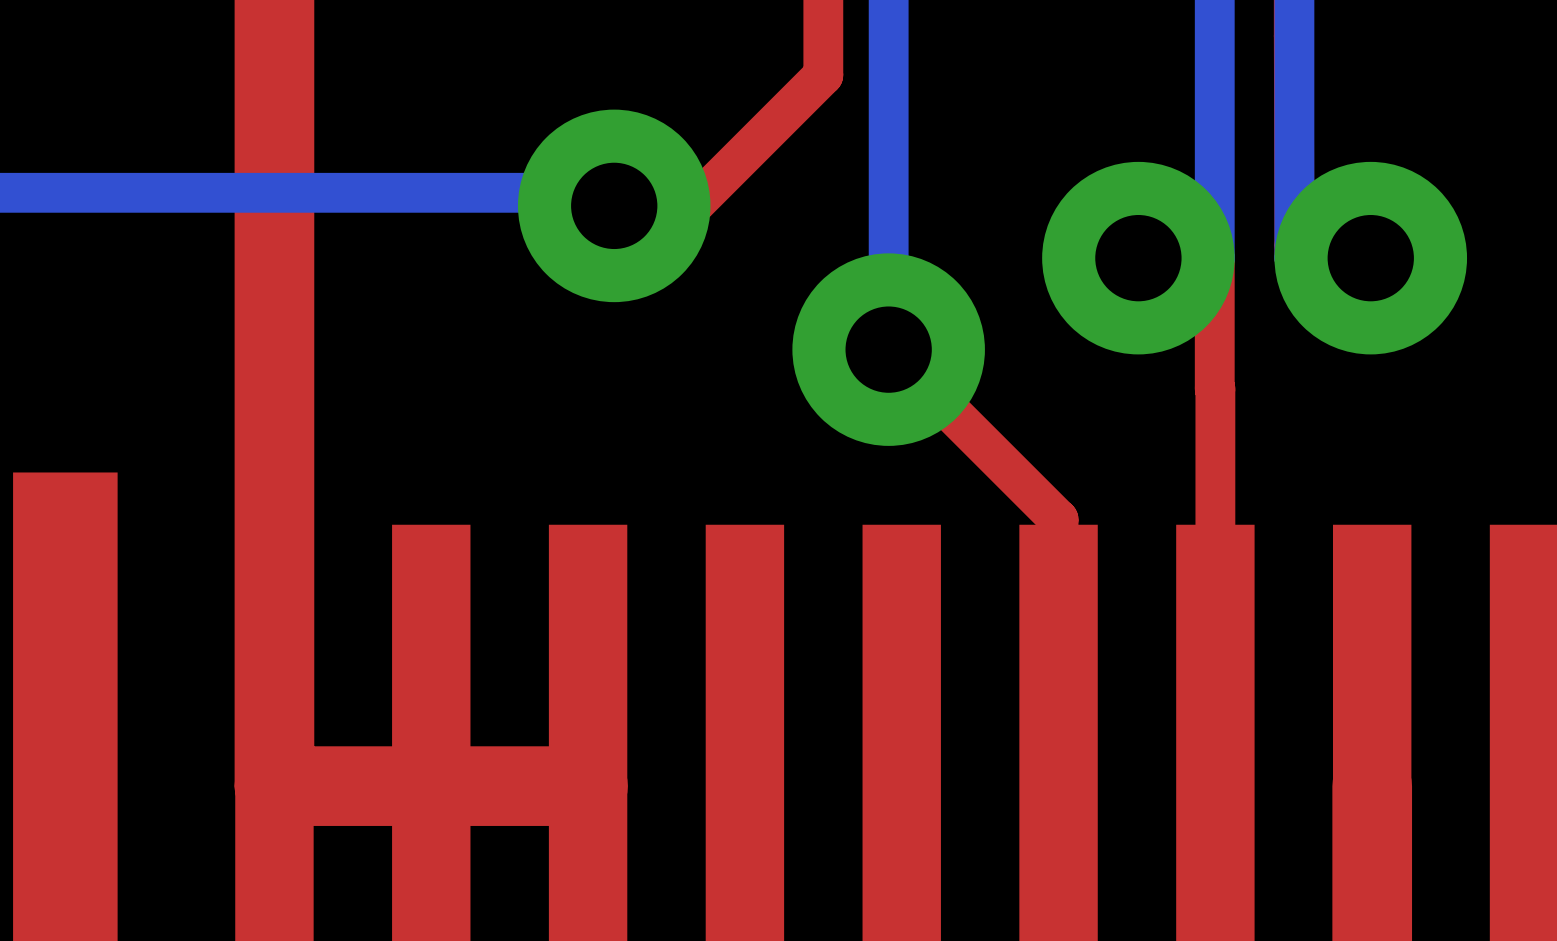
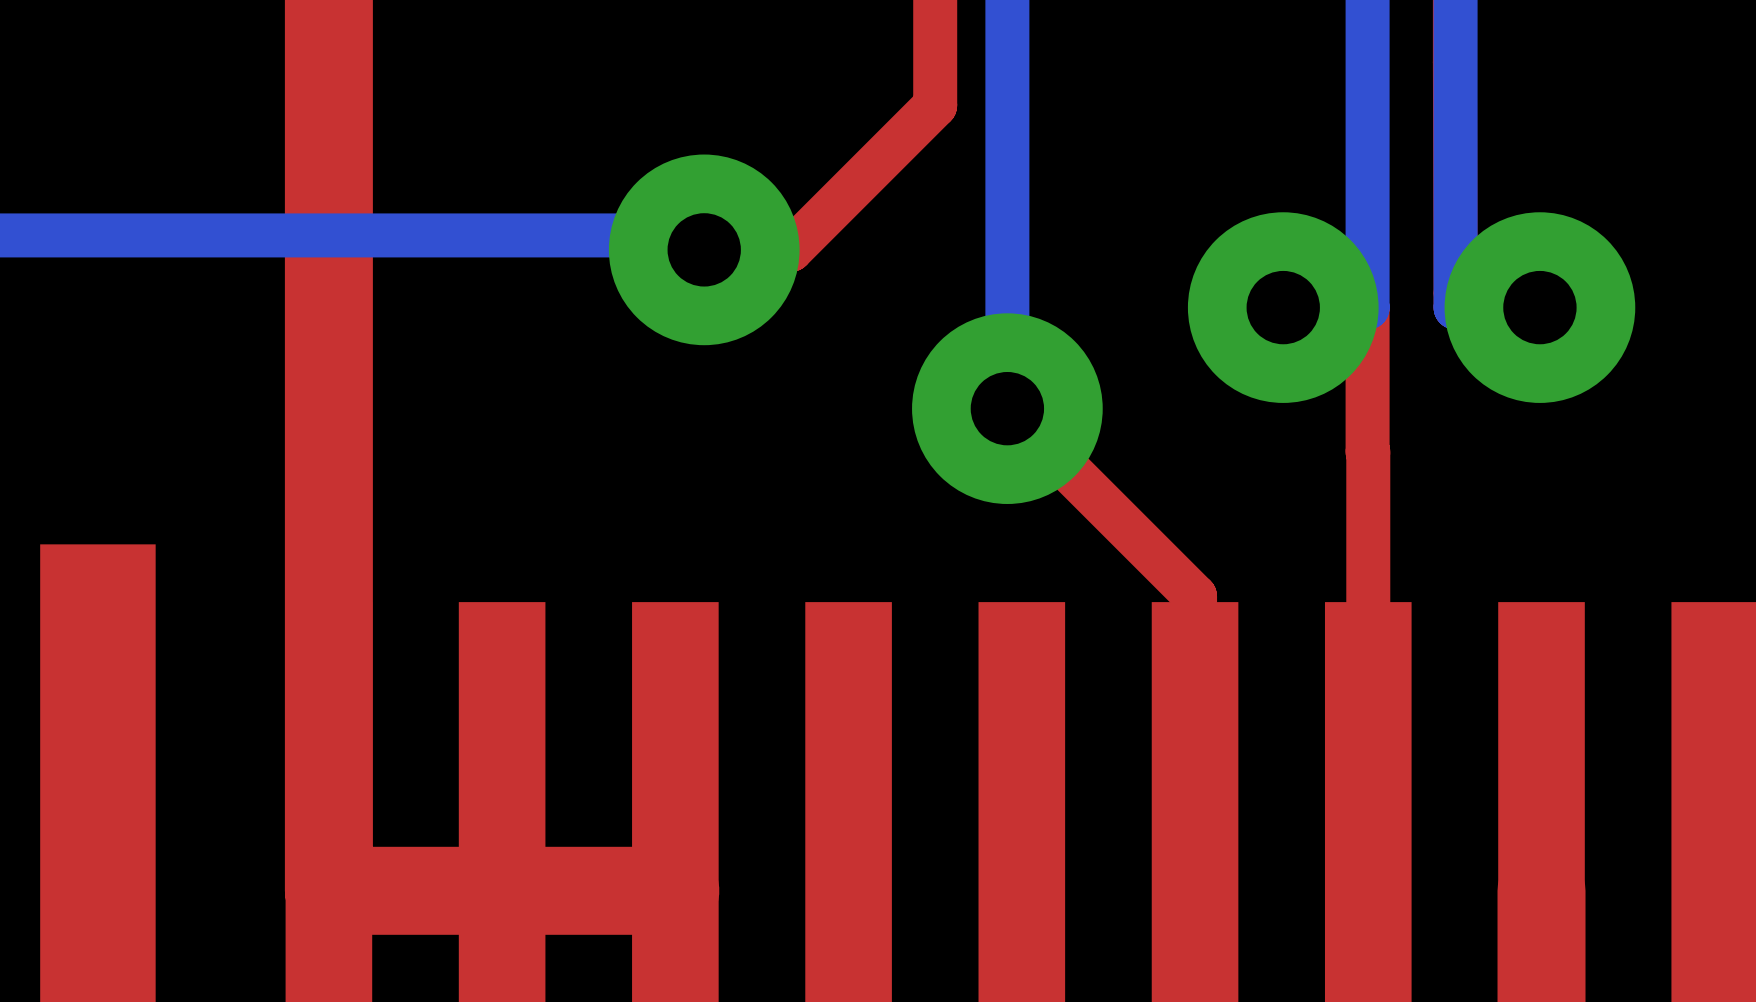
via size: [517, 109, 711, 303] -> [608, 154, 800, 346]
via size: [1042, 161, 1235, 355] -> [1187, 212, 1379, 403]
via size: [1274, 161, 1468, 355] -> [1444, 212, 1636, 403]
via size: [792, 253, 985, 446] -> [912, 313, 1103, 504]

